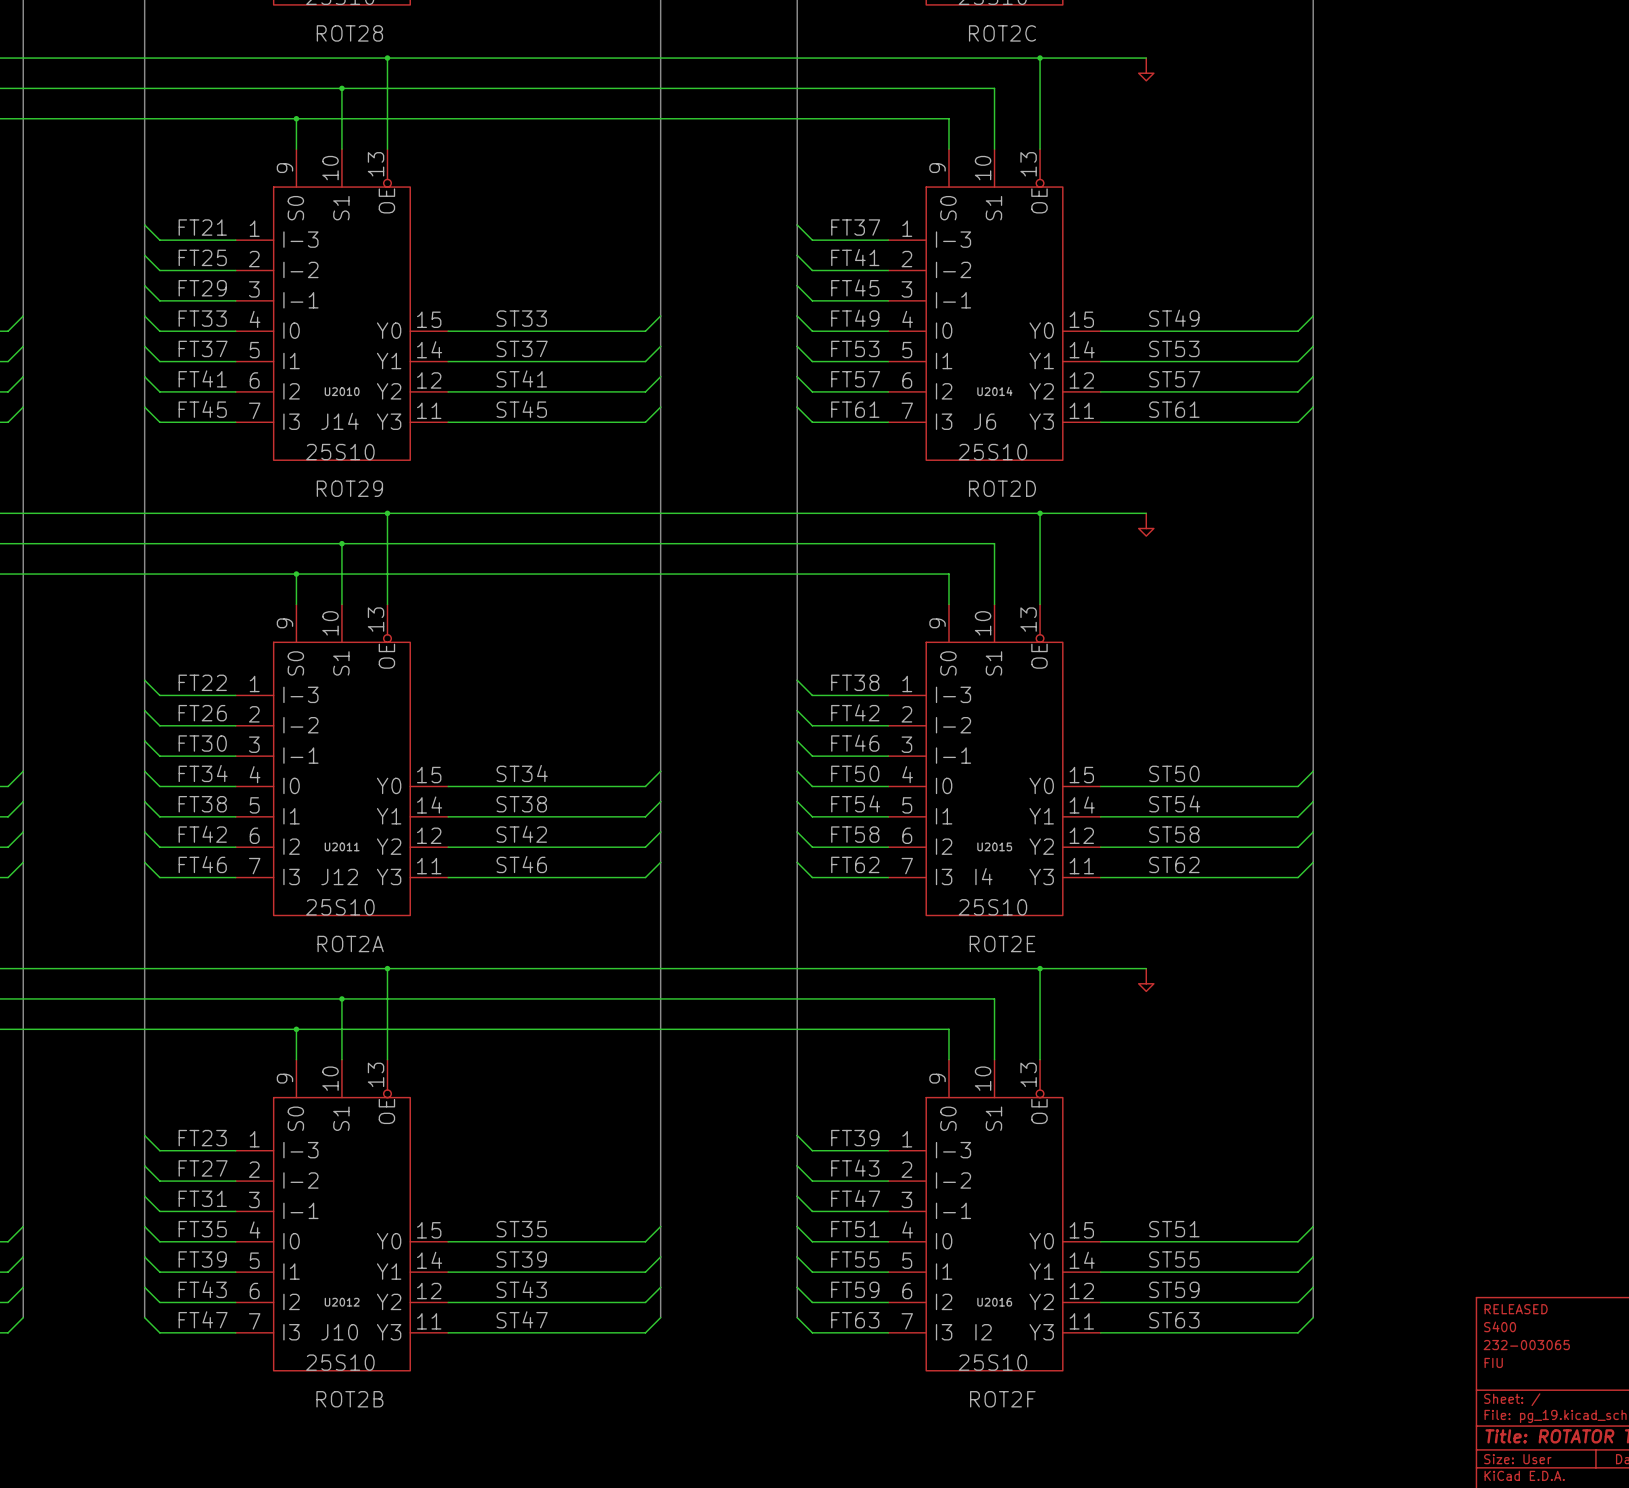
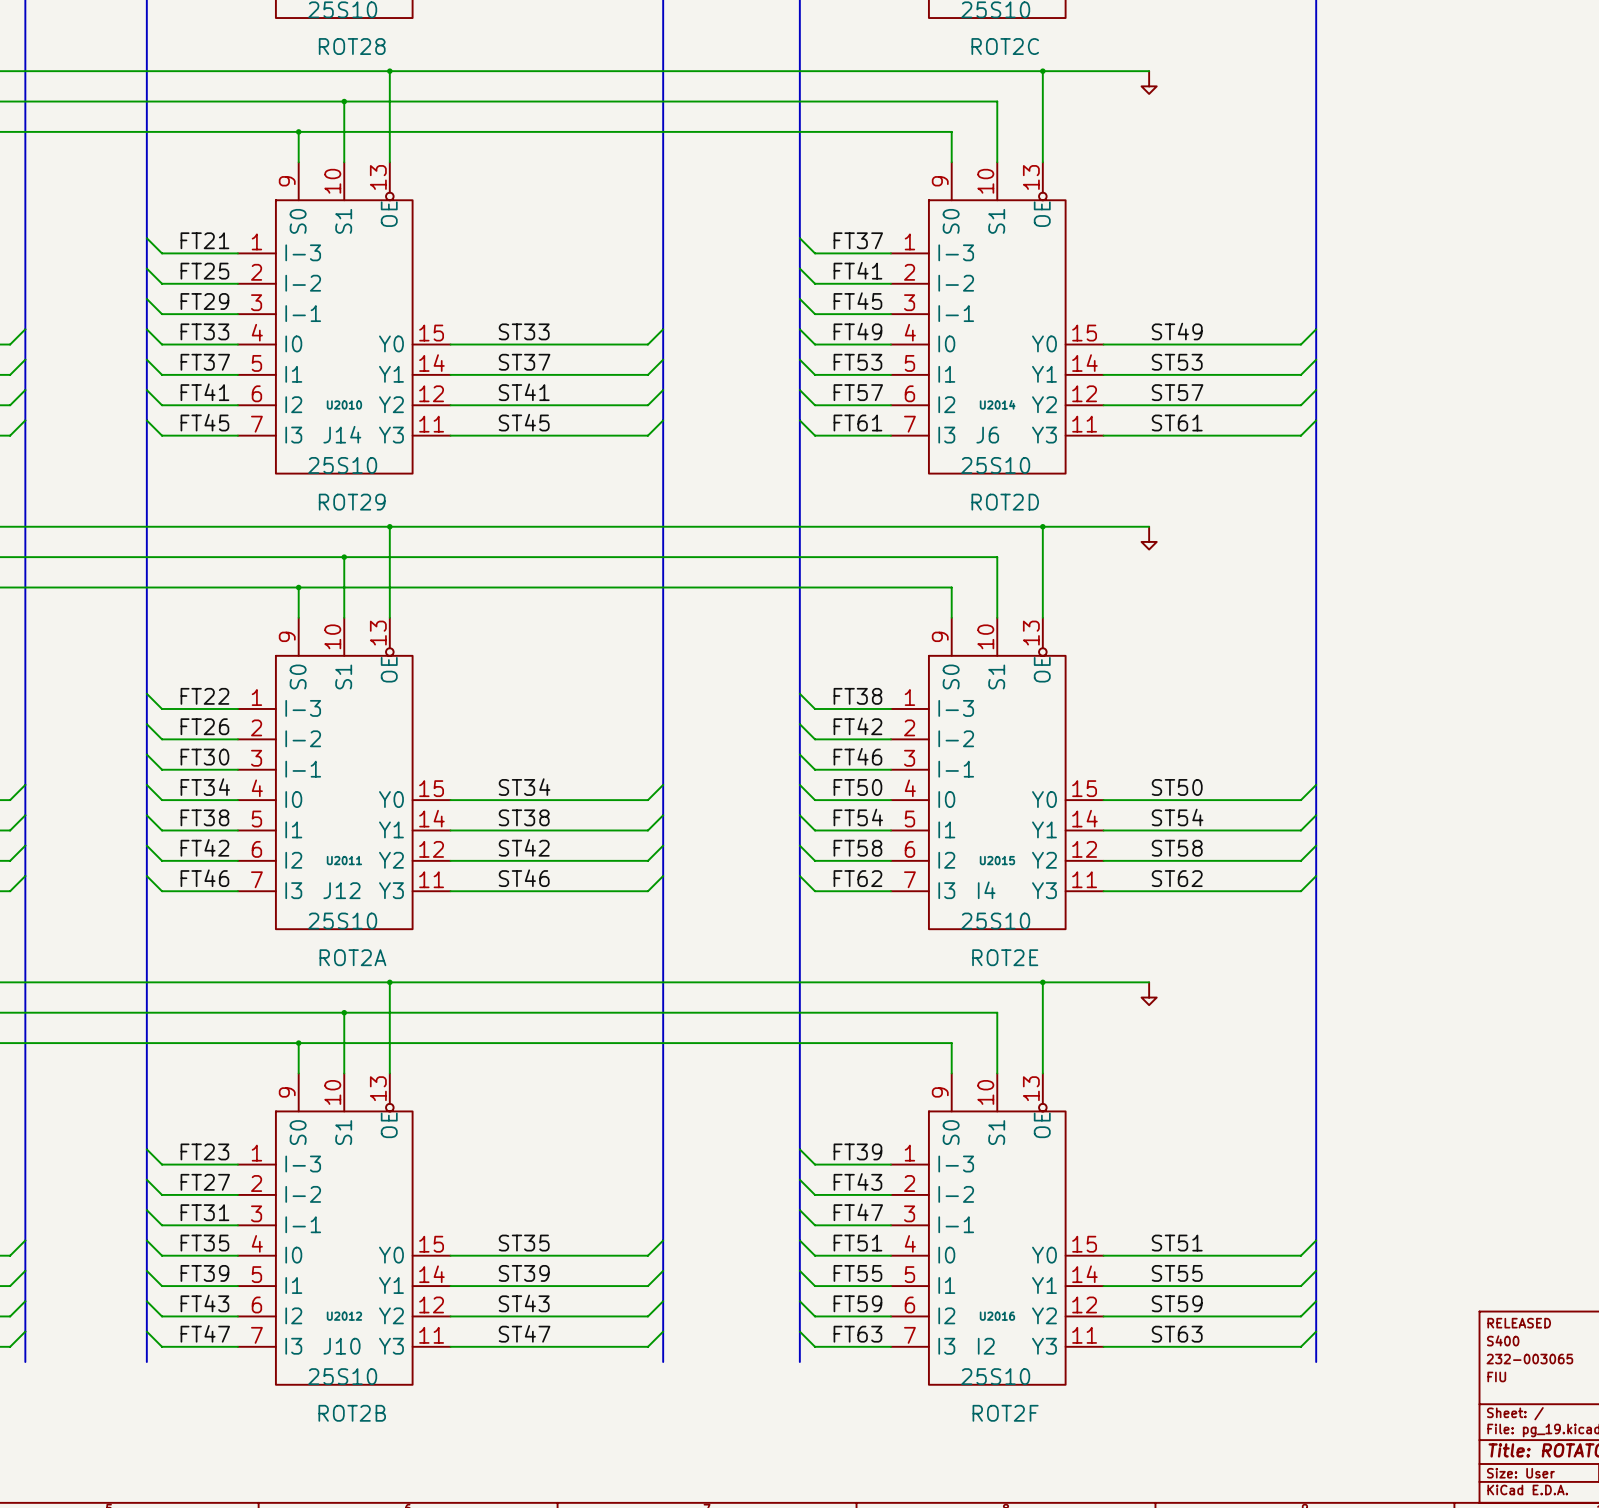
bus: none -> (25, 1331) (25, 1362)
bus: none -> (146, 1331) (146, 1362)
bus: none -> (663, 1331) (663, 1362)
bus: none -> (799, 1331) (799, 1362)
bus: none -> (1316, 1331) (1316, 1362)

